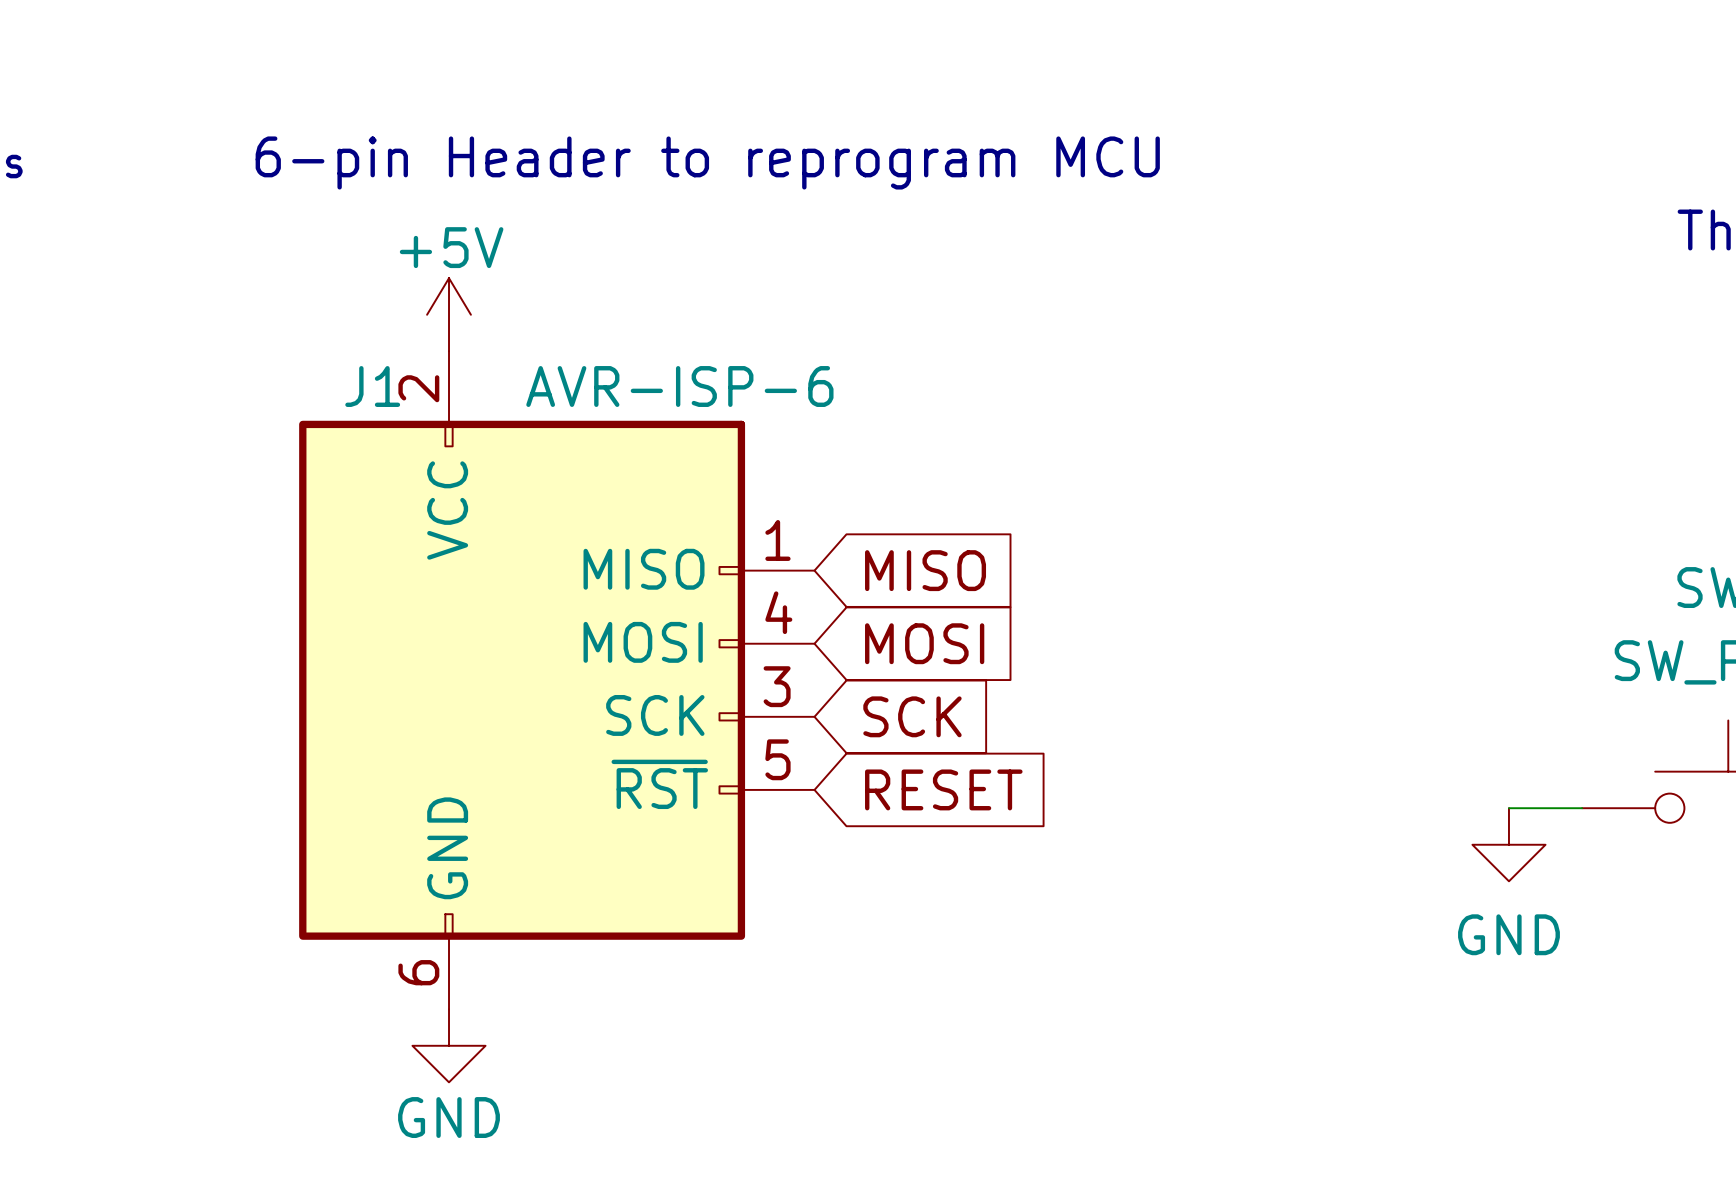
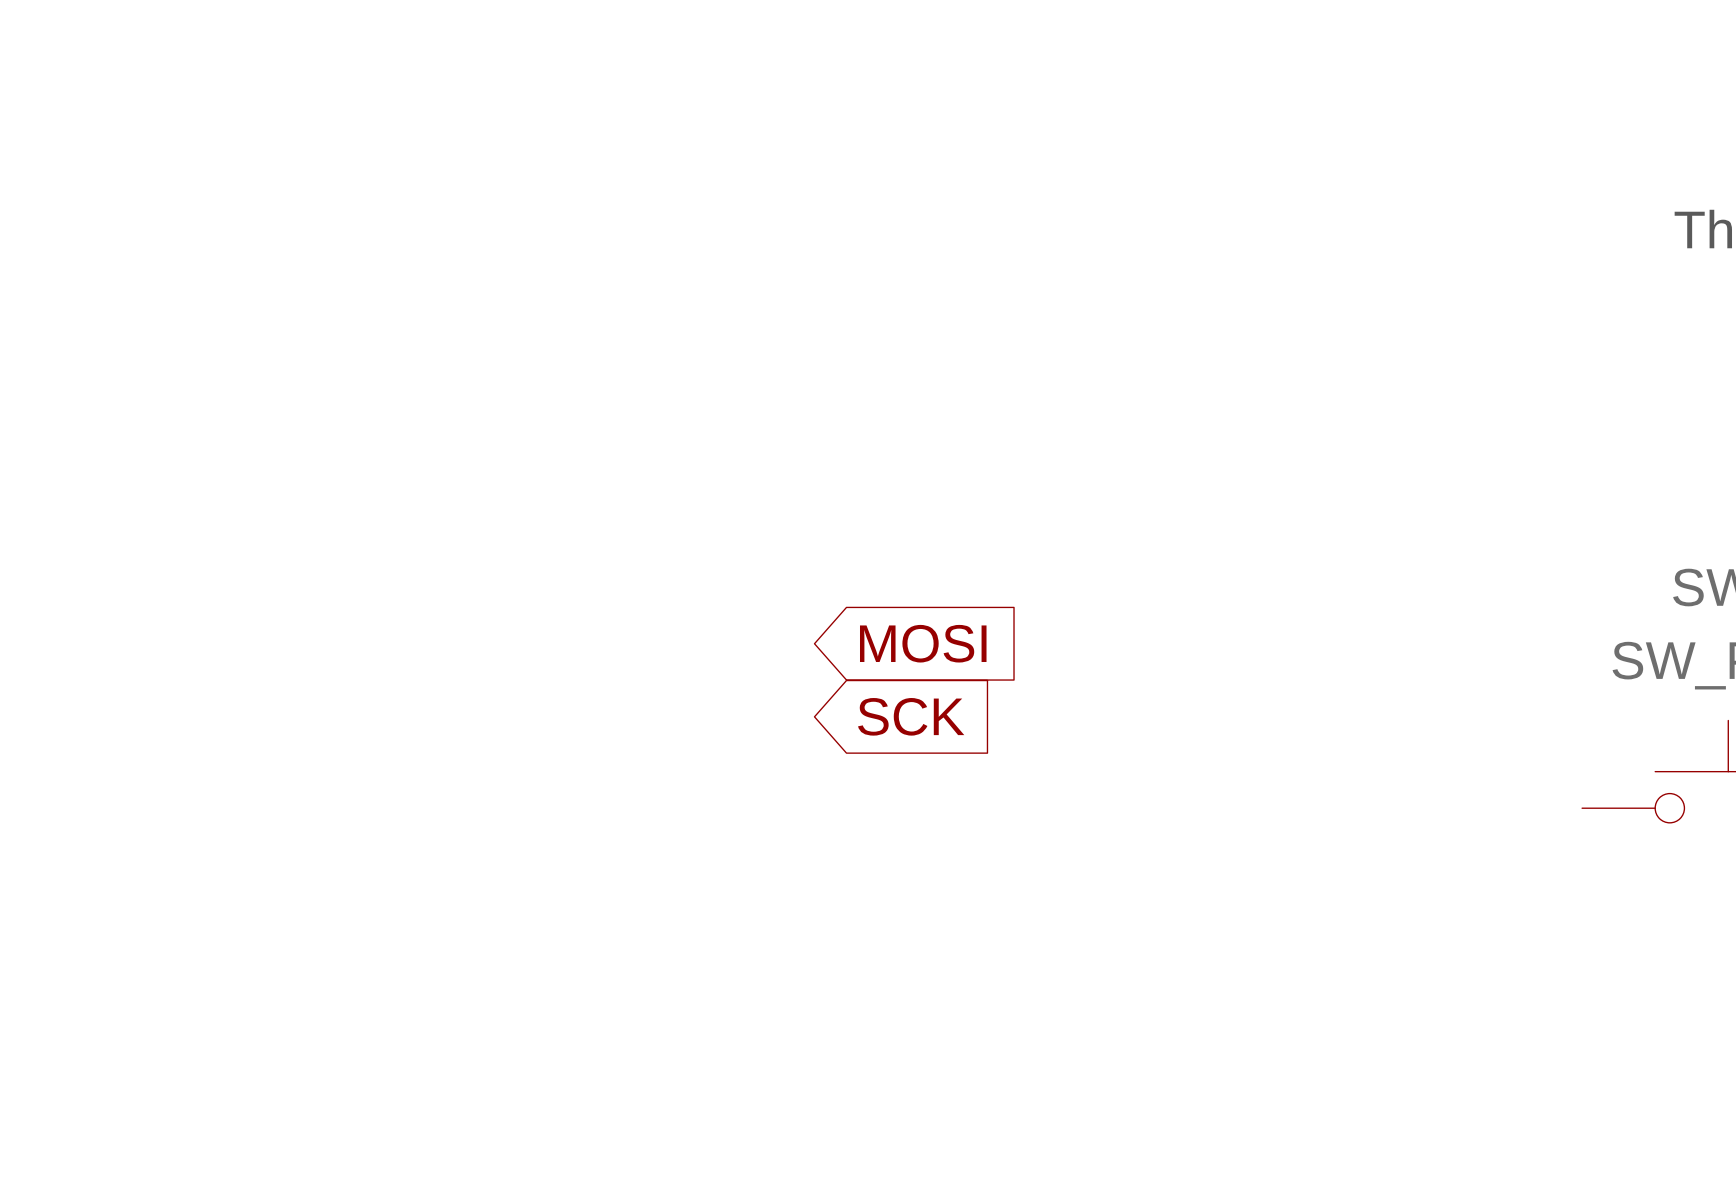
text: 6-pin Header to reprogram MCU (707, 162) -> none
power symbol: +5V (449, 314) -> none
global label: MISO (925, 570) -> none
J1: AVR-ISP-6 (556, 680) -> none
global label: RESET (943, 789) -> none
wire: (1508, 808) (1582, 808) -> none
power symbol: GND (1508, 844) -> none
power symbol: GND (449, 1045) -> none

